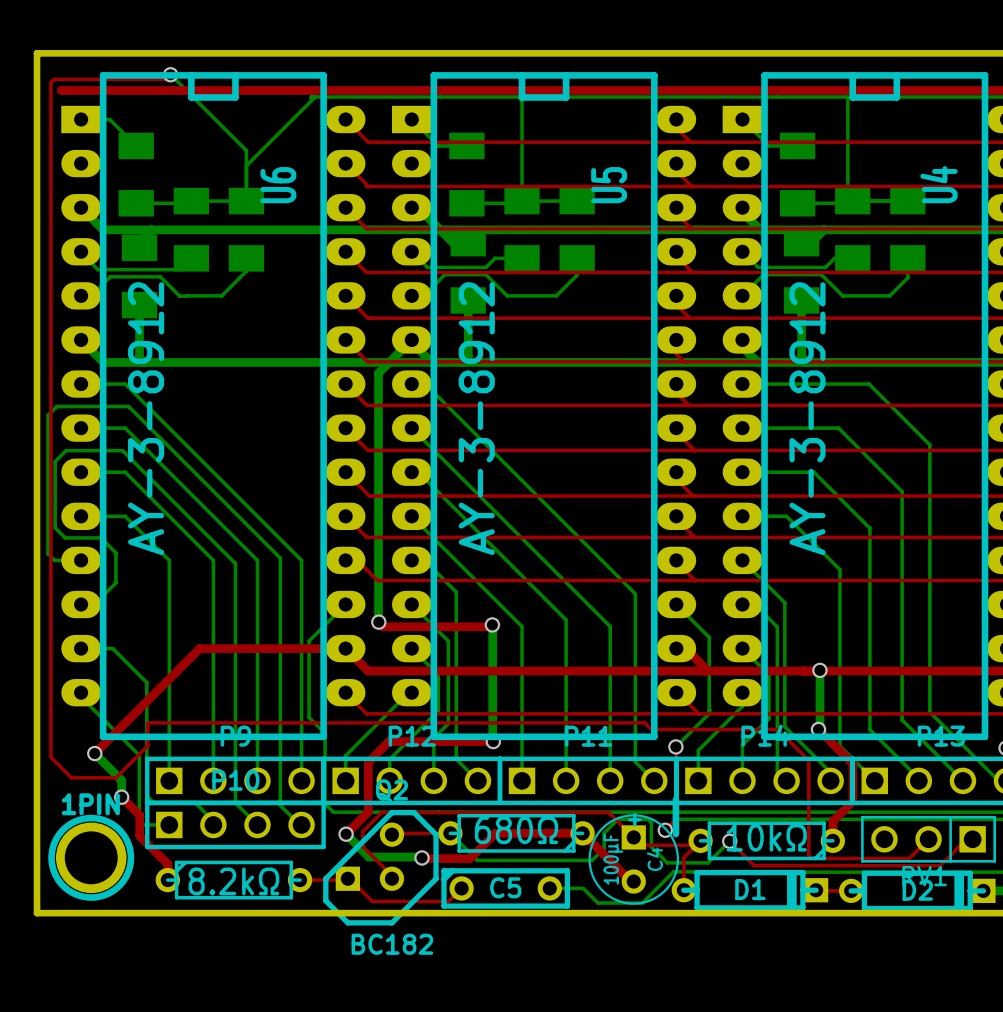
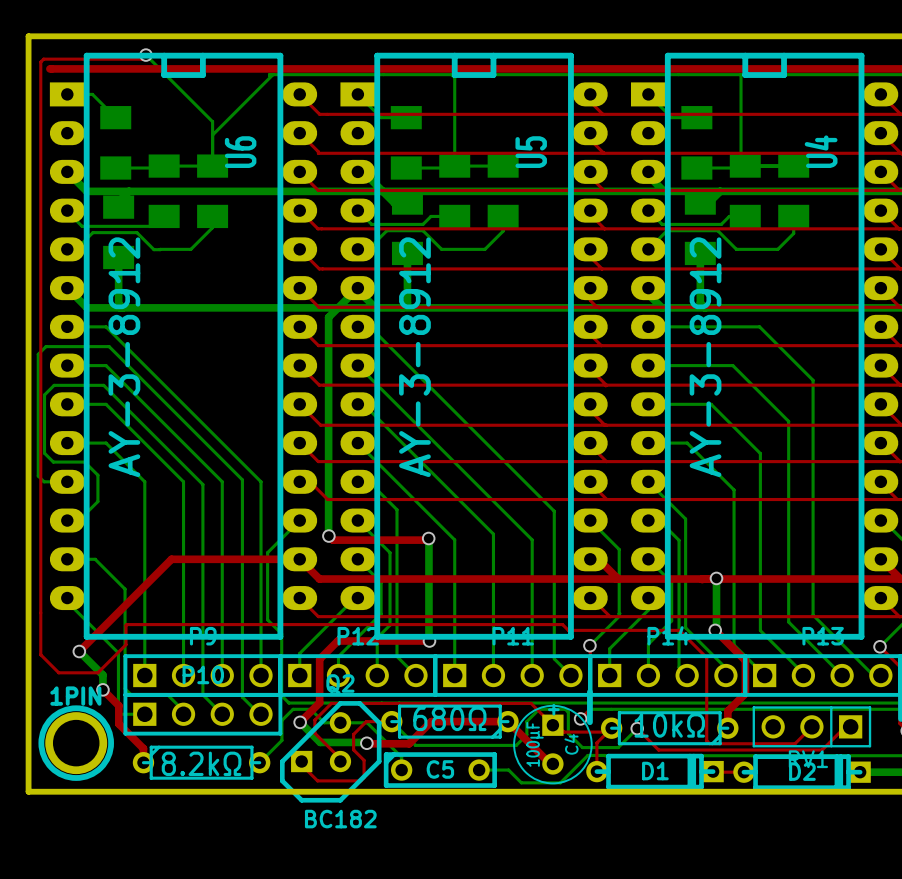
top track: (421, 833) (391, 834) -> (366, 721) (353, 734) (353, 749) (364, 760) (364, 777) (360, 780) (317, 780) (301, 765) (301, 761)
top track: (300, 880) (349, 878) (372, 901) (448, 901) (461, 888) -> none
bottom track: none -> (259, 762) (281, 740) (281, 720) (293, 709) (310, 709) (324, 722) (367, 722) (401, 757) (401, 770)

